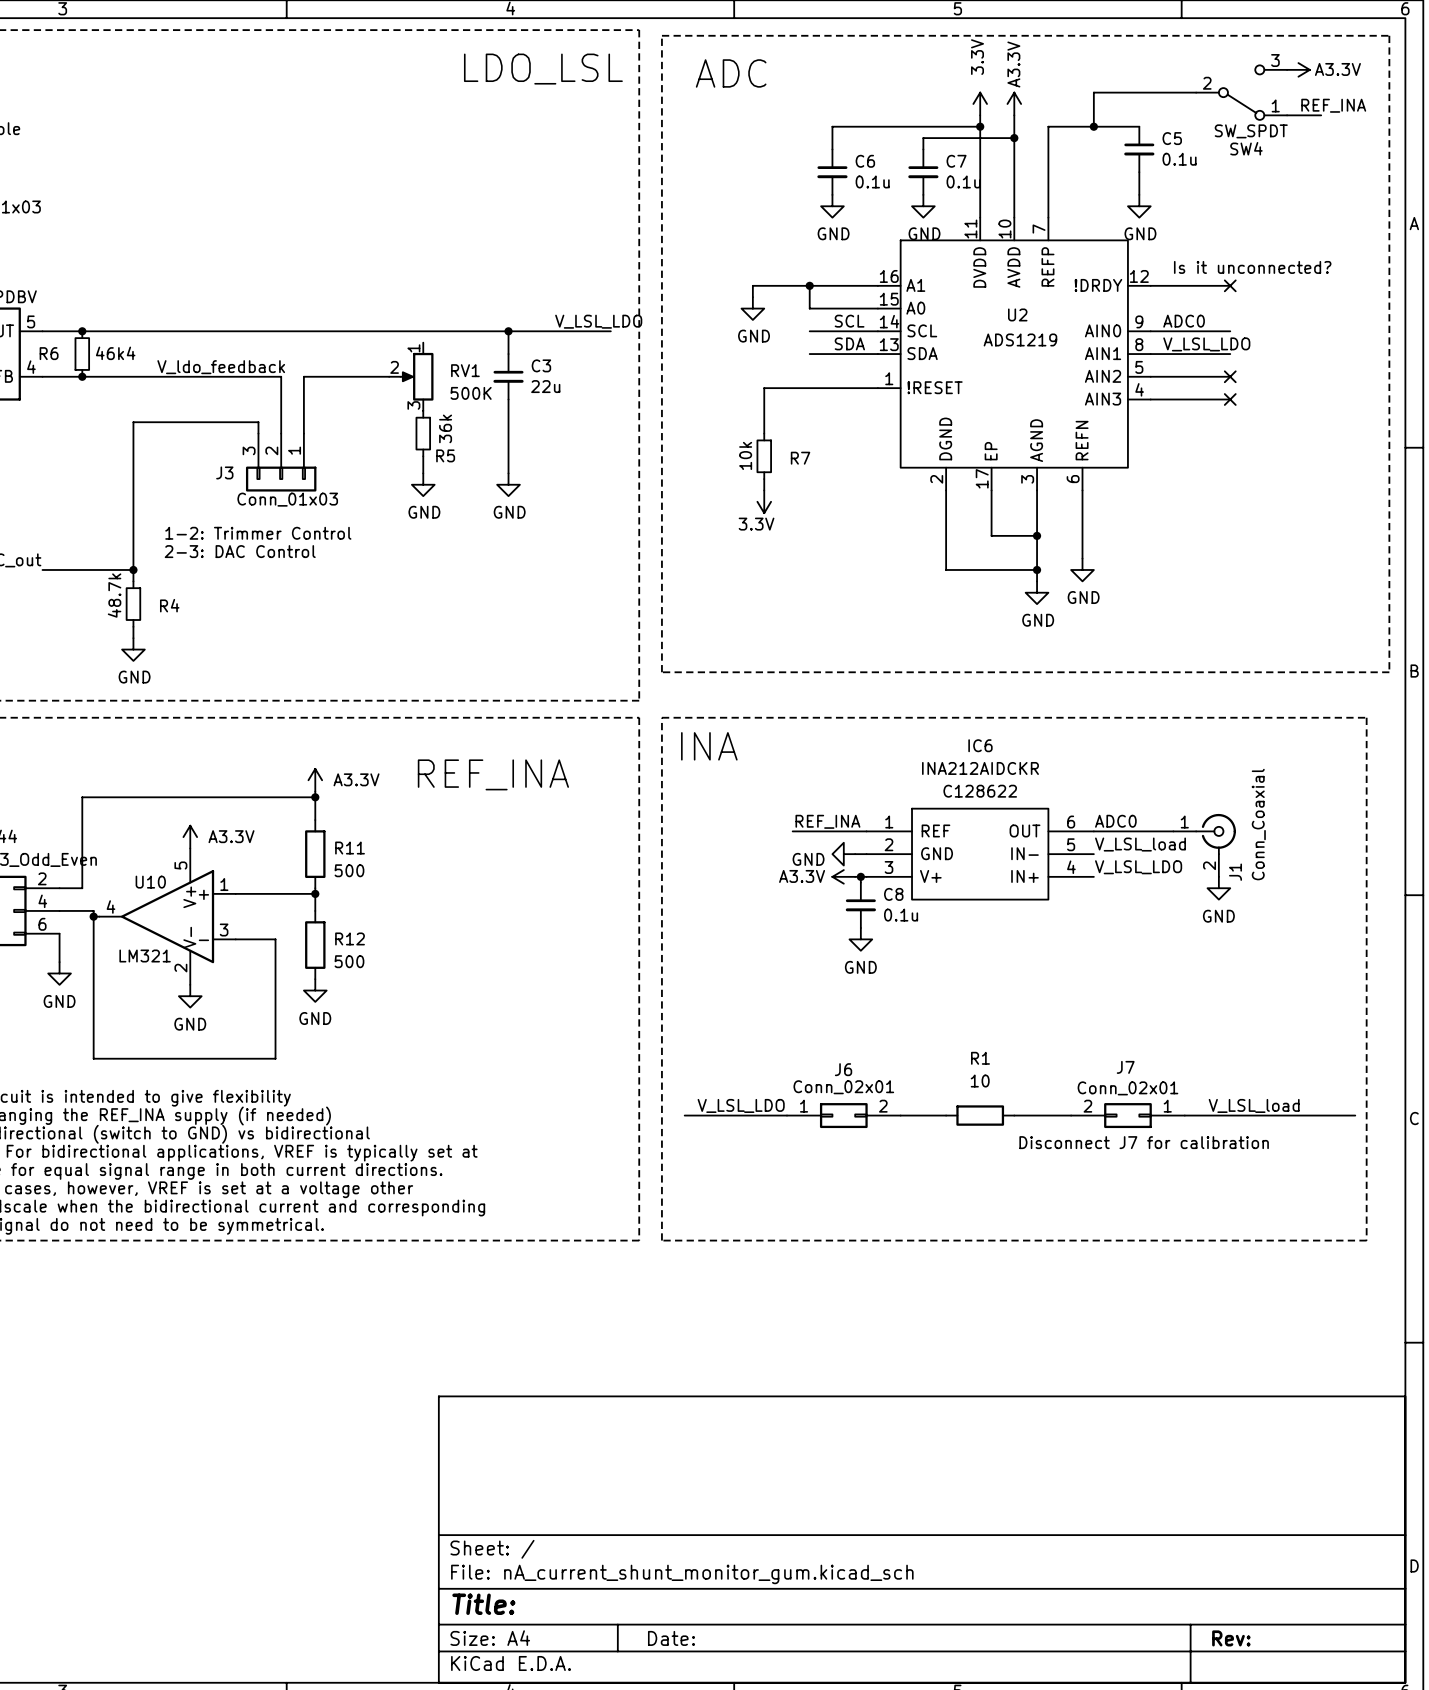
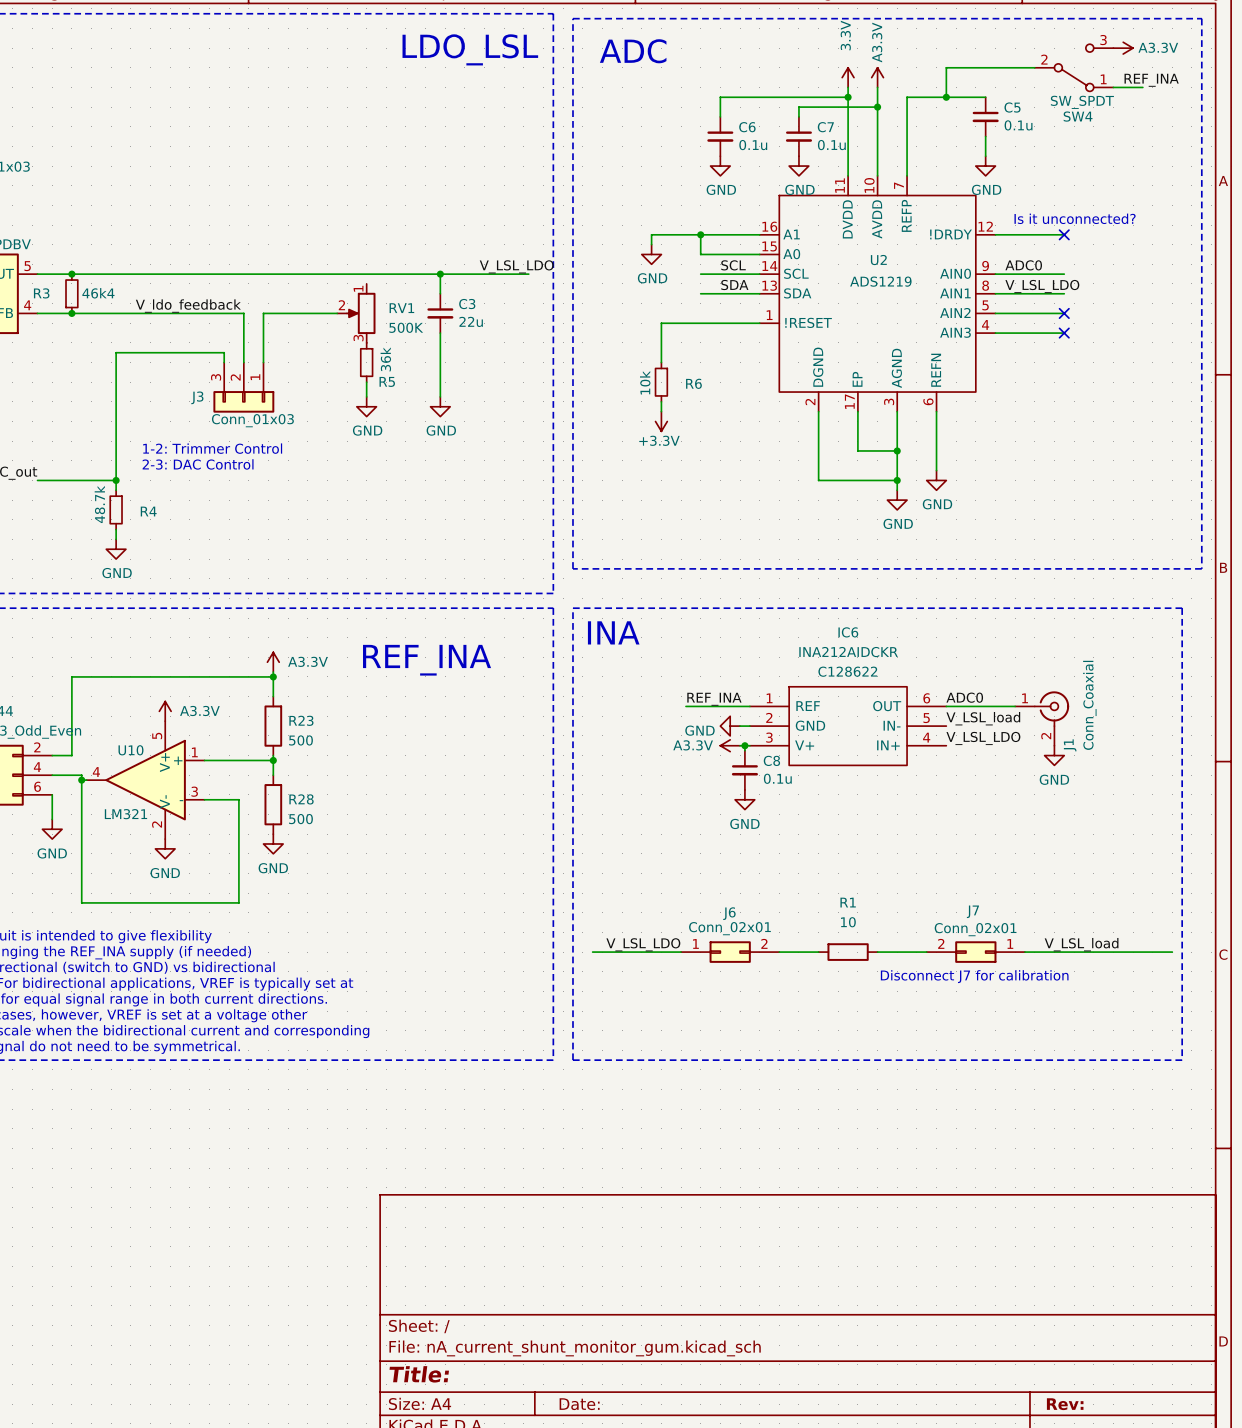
R6 name: R6 (49, 353) -> R3 (41, 293)
R7 name: R7 (800, 458) -> R6 (693, 383)
power symbol: 3.3V (764, 501) -> +3.3V (661, 421)
R11 name: R11 (350, 848) -> R23 (301, 720)
R12 name: R12 (350, 938) -> R28 (301, 799)

